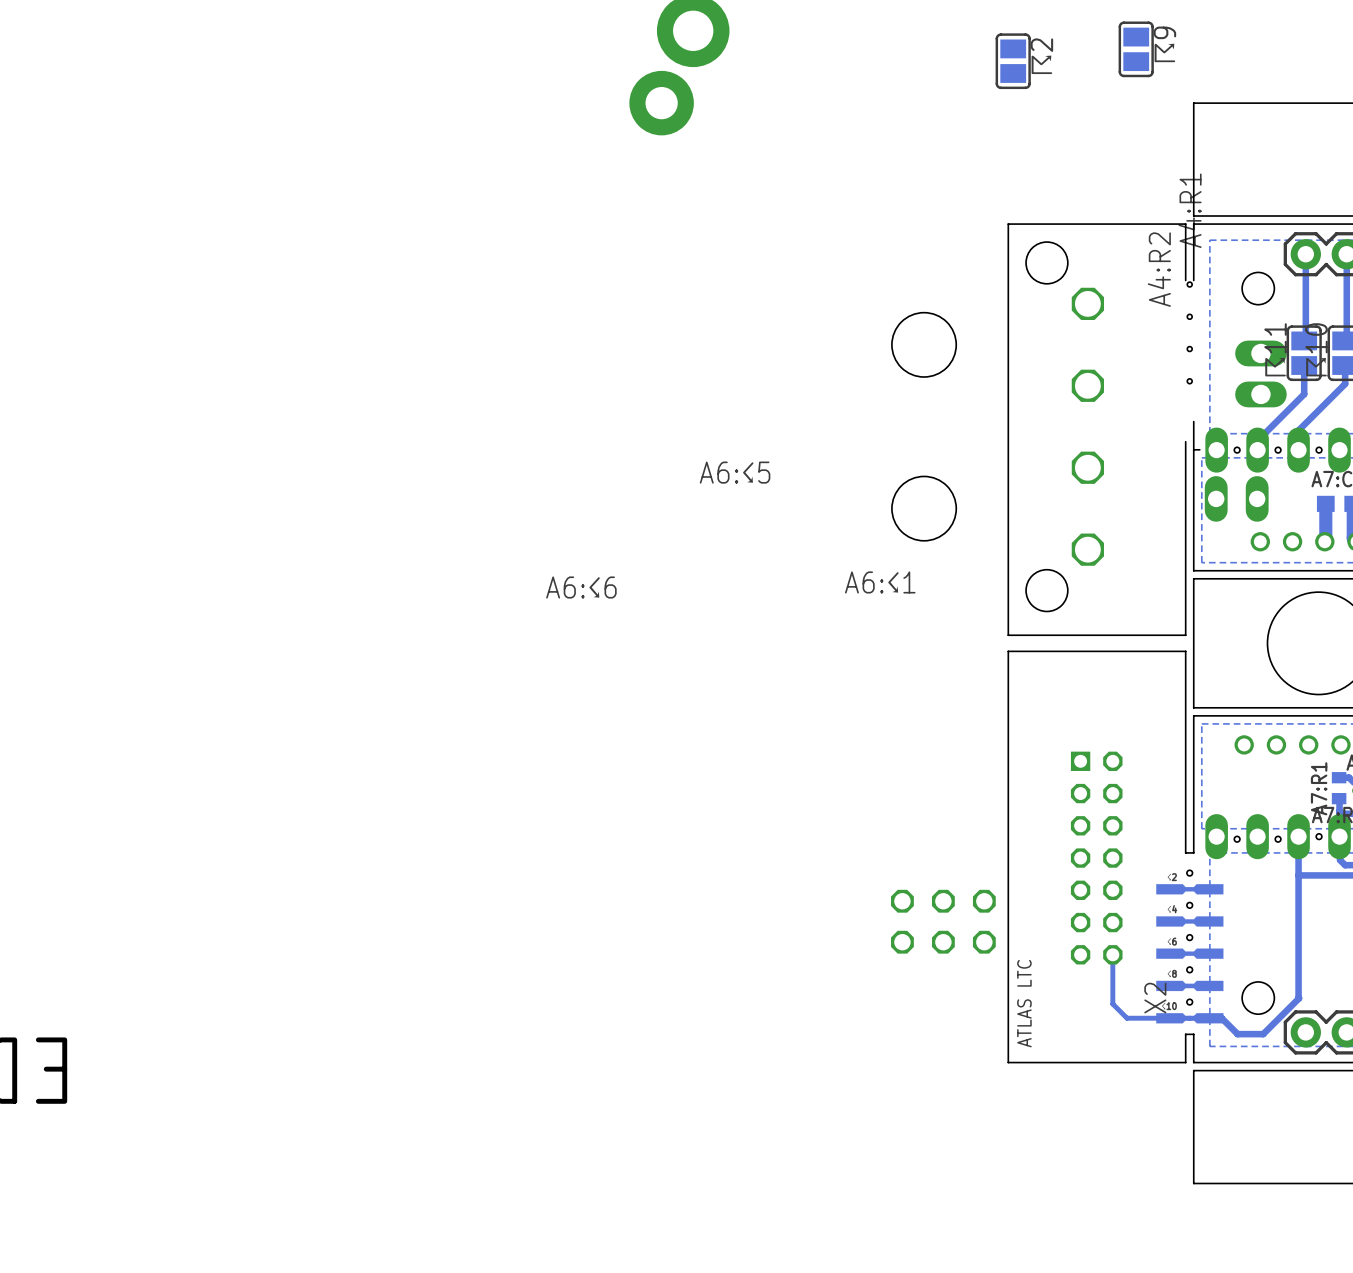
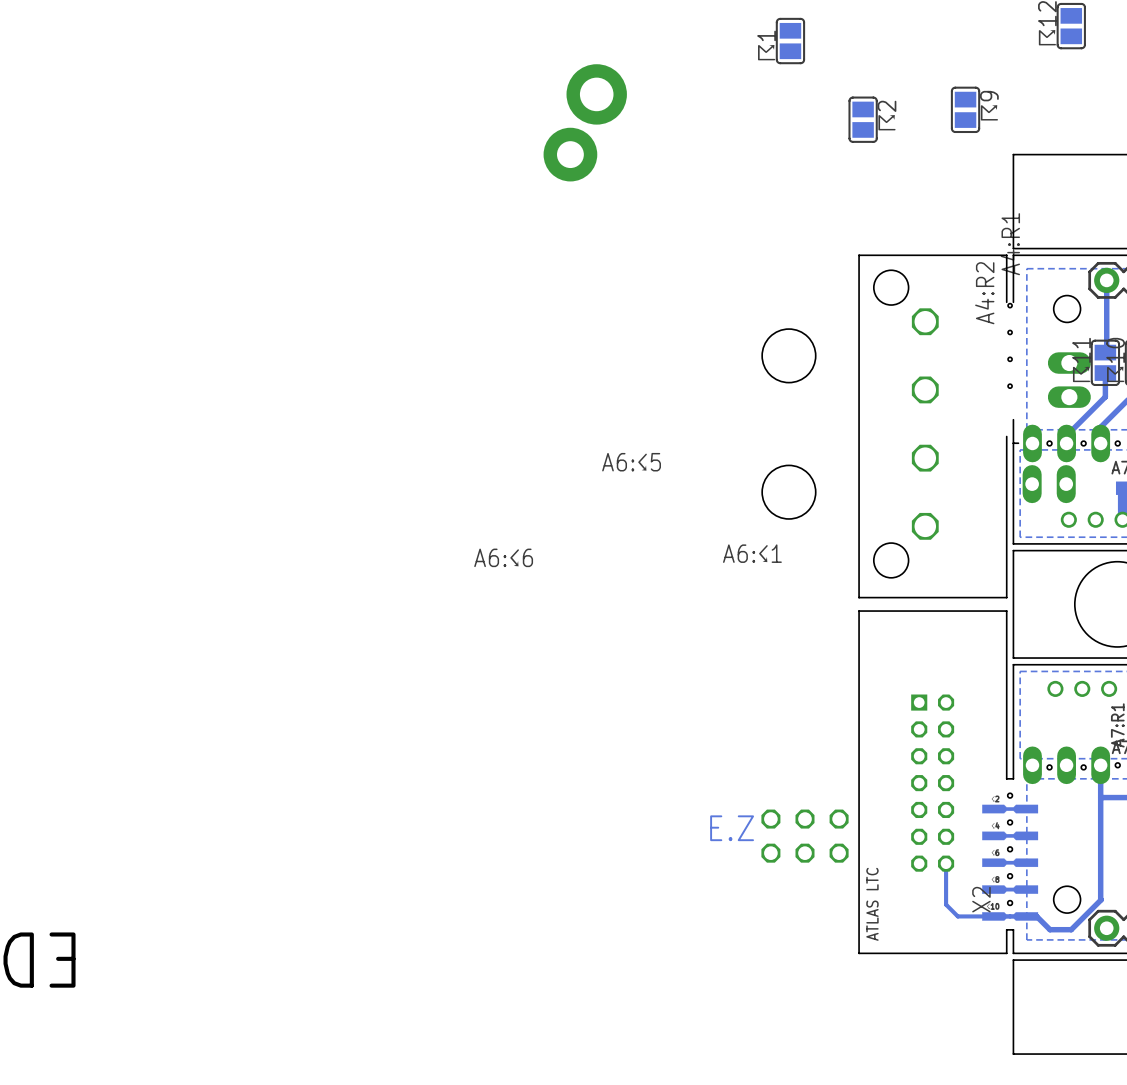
text: none -> E.Z (732, 828)

